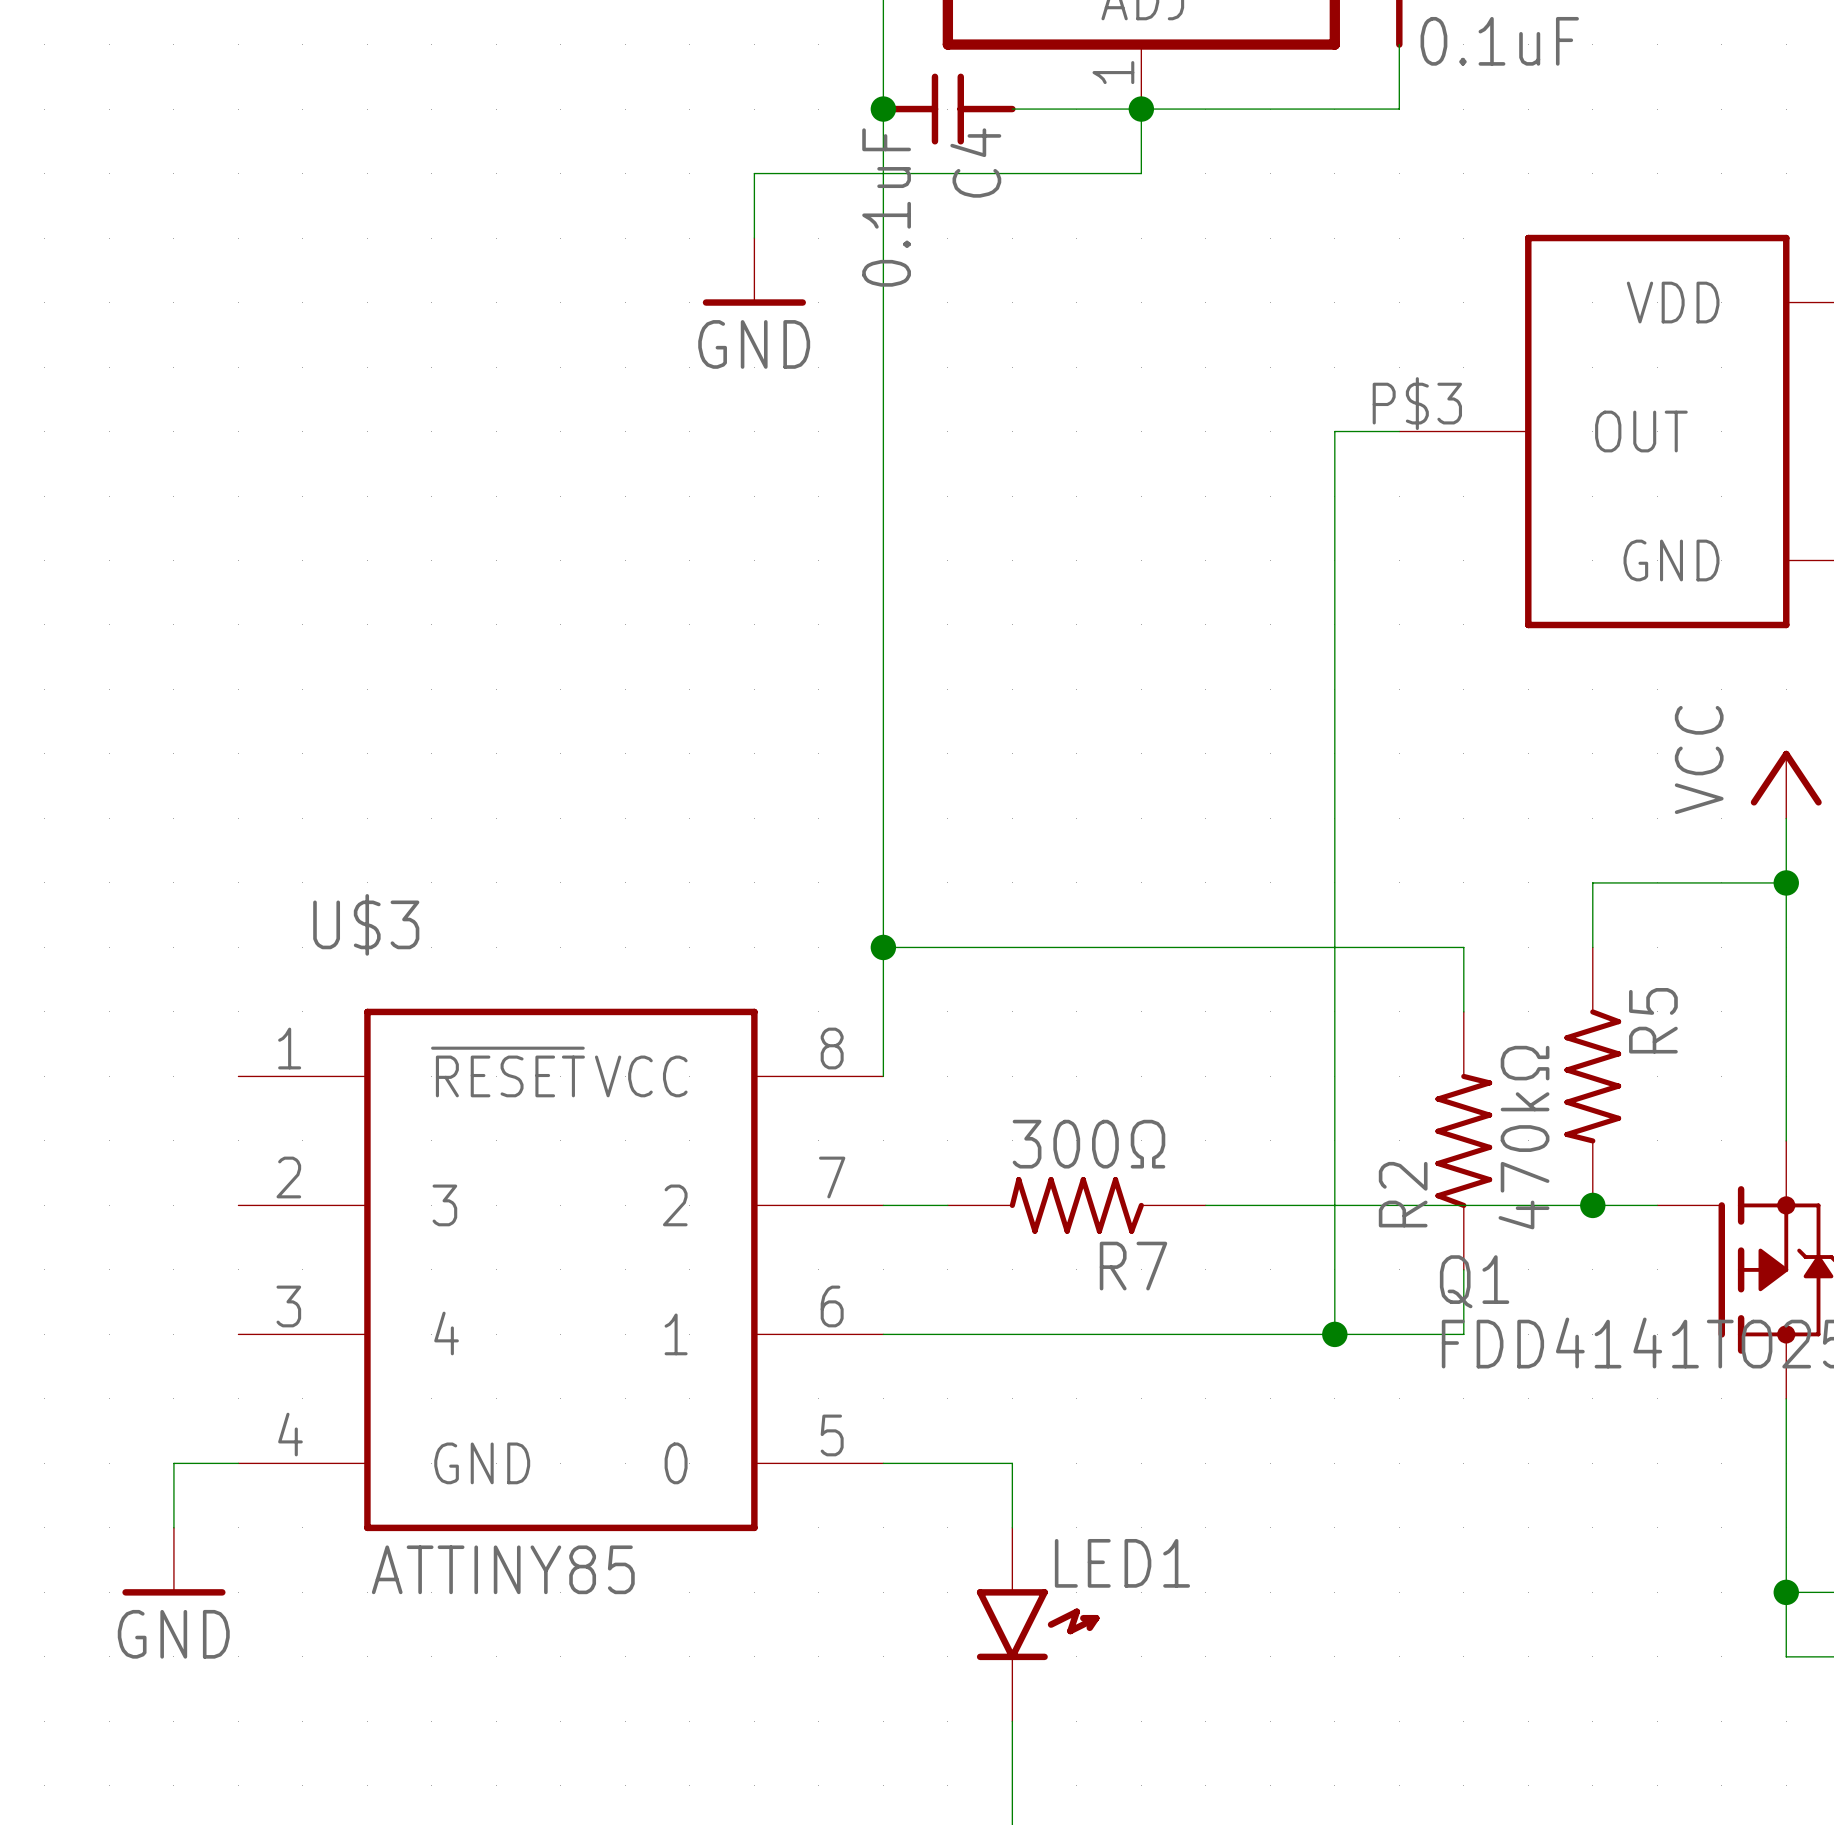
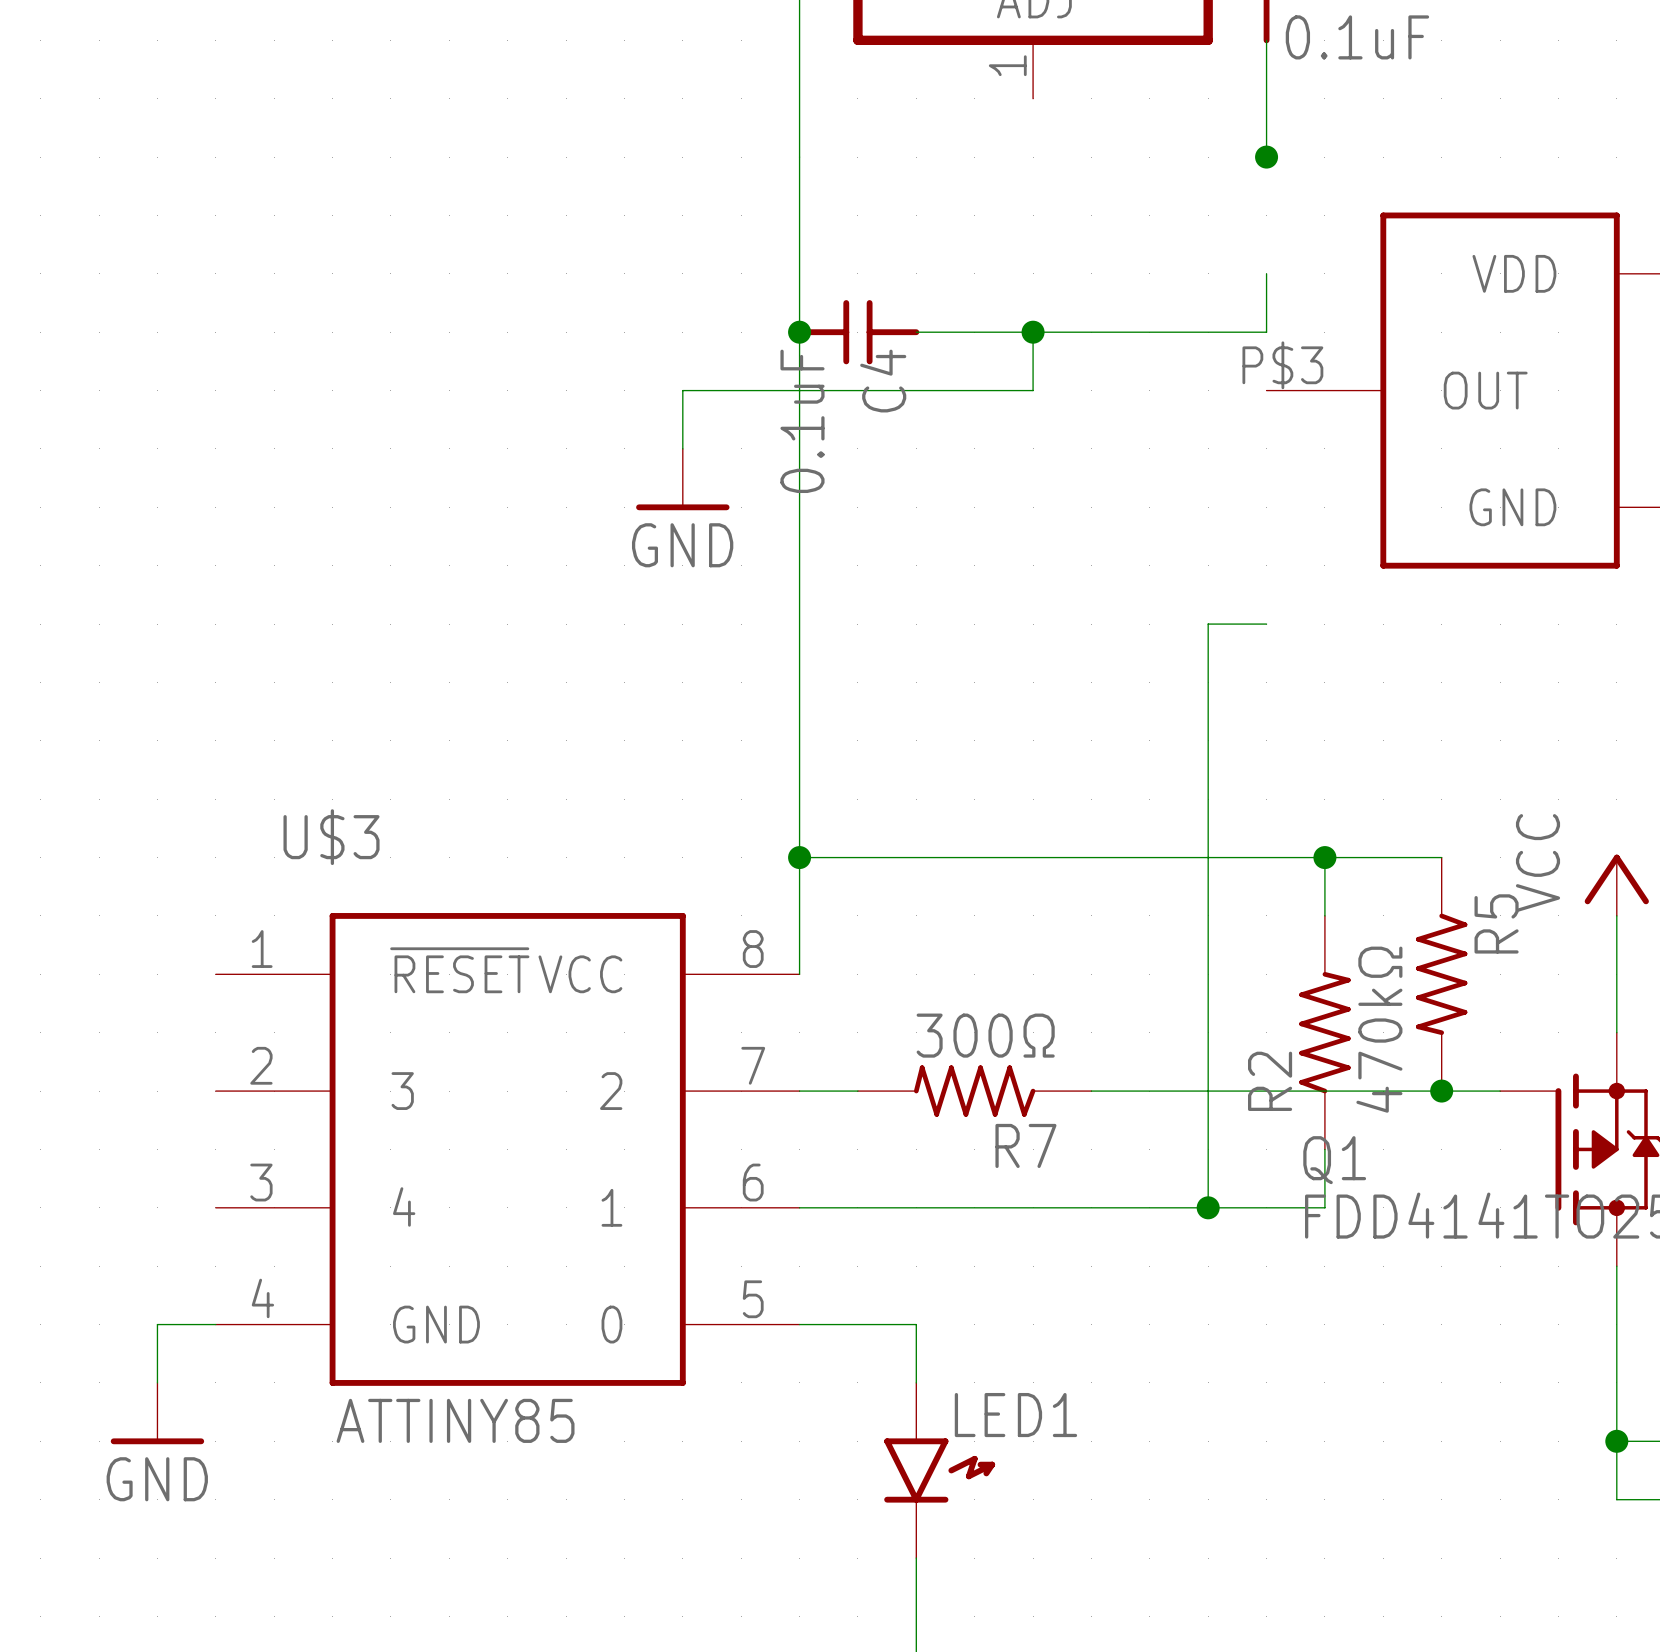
junction: (883, 109) -> none
C4 position: (947, 109) -> (857, 332)
wire: (1012, 109) (1399, 109) -> (1266, 157) (1266, 98)
wire: (1141, 109) (1141, 173) (754, 173) (754, 238) -> (1033, 332) (1033, 390) (682, 390) (682, 448)
junction: (1141, 109) -> none
junction: none -> (1266, 157)
power symbol position: GND (754, 271) -> GND (682, 479)
wire: none -> (1266, 273) (1266, 332) (916, 332)
junction: none -> (799, 332)
junction: none -> (1033, 332)
wire: (1399, 431) (1334, 431) (1334, 689) -> (1266, 624) (1208, 624)
power symbol position: VCC (1786, 784) -> VCC (1616, 885)
wire: (1786, 818) (1786, 1011) -> none
wire: (1786, 882) (1592, 882) (1592, 947) -> (1324, 857) (1441, 857)
junction: (1786, 882) -> none
junction: none -> (1324, 857)

